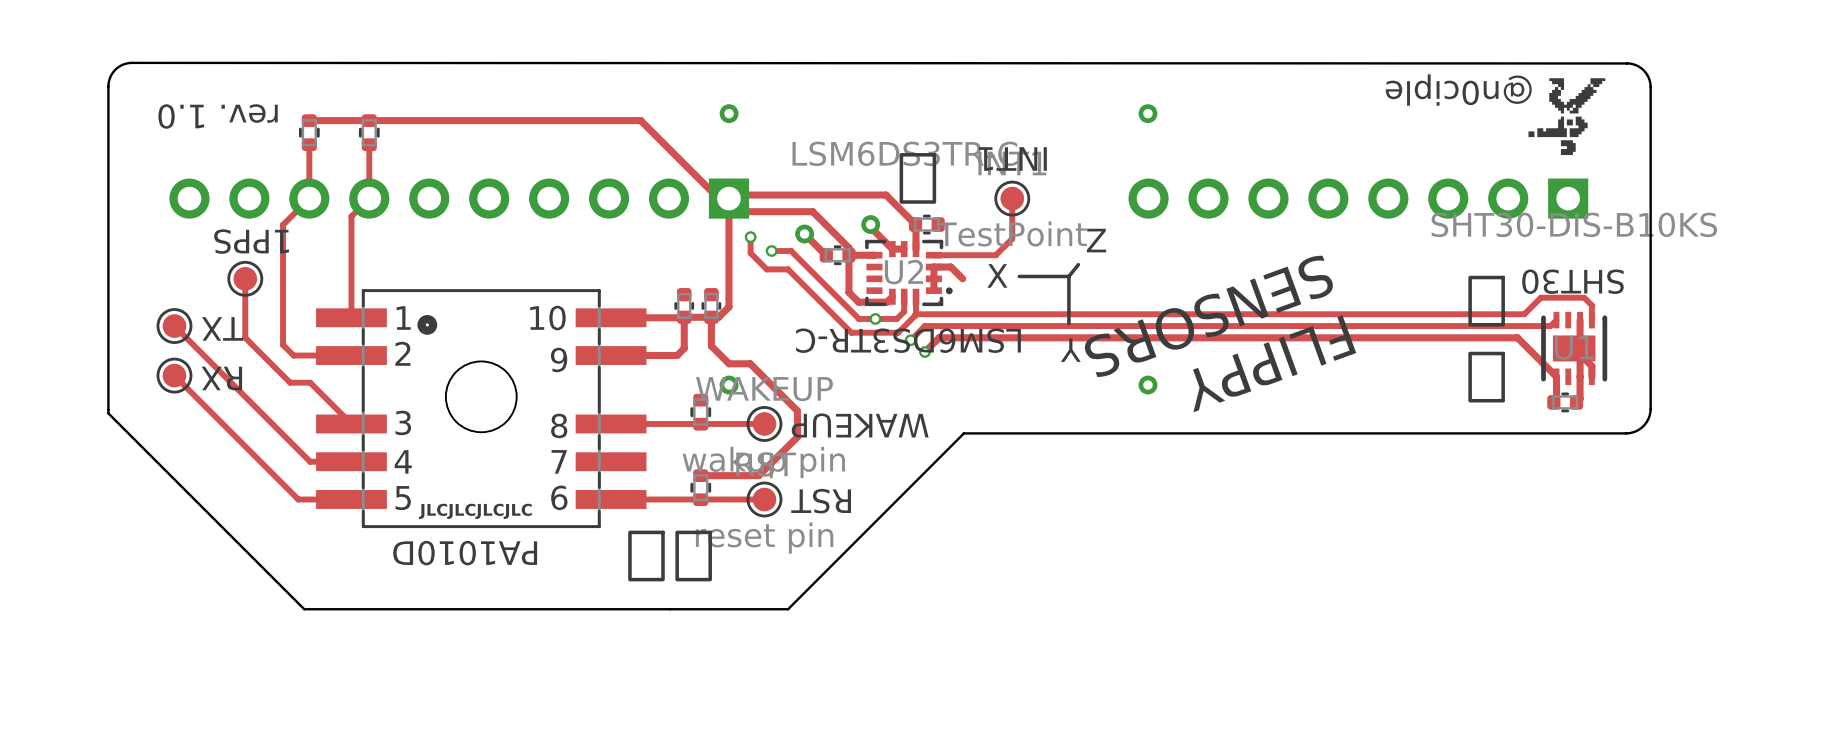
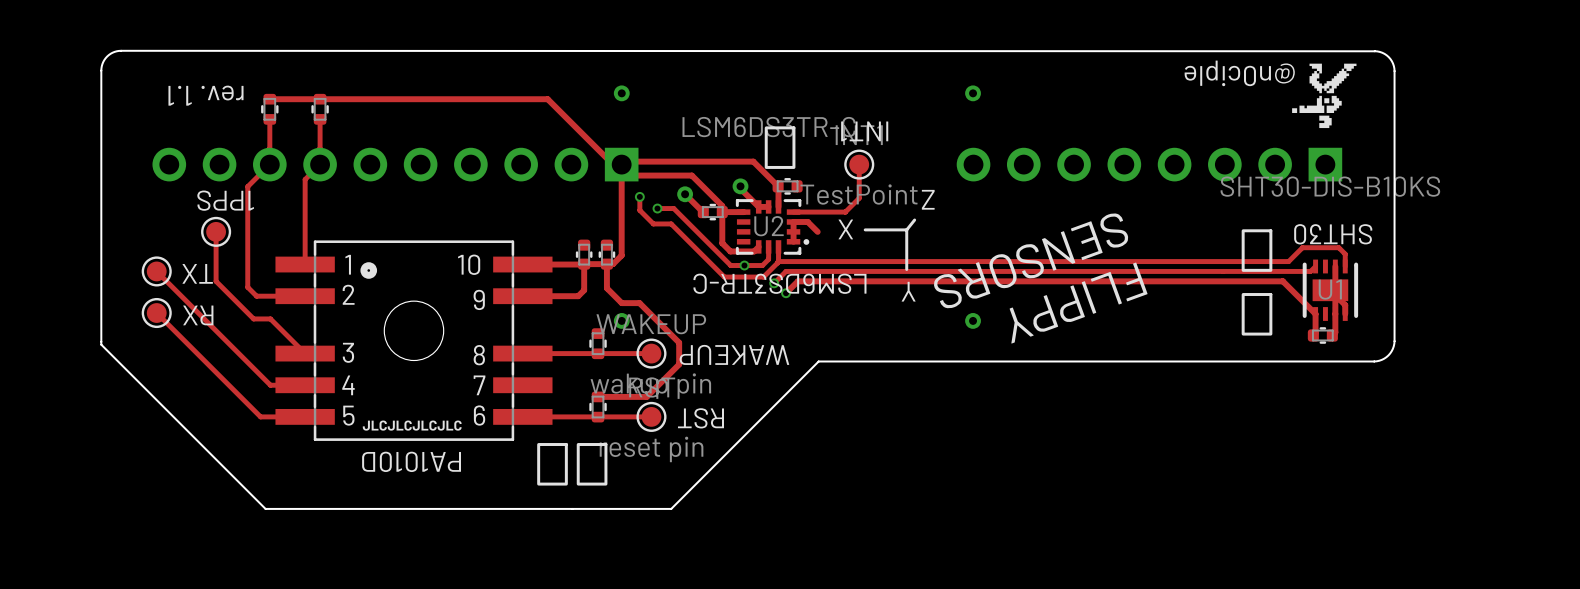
text: rev. 1.0 (218, 116) -> rev. 1.1 (205, 95)

